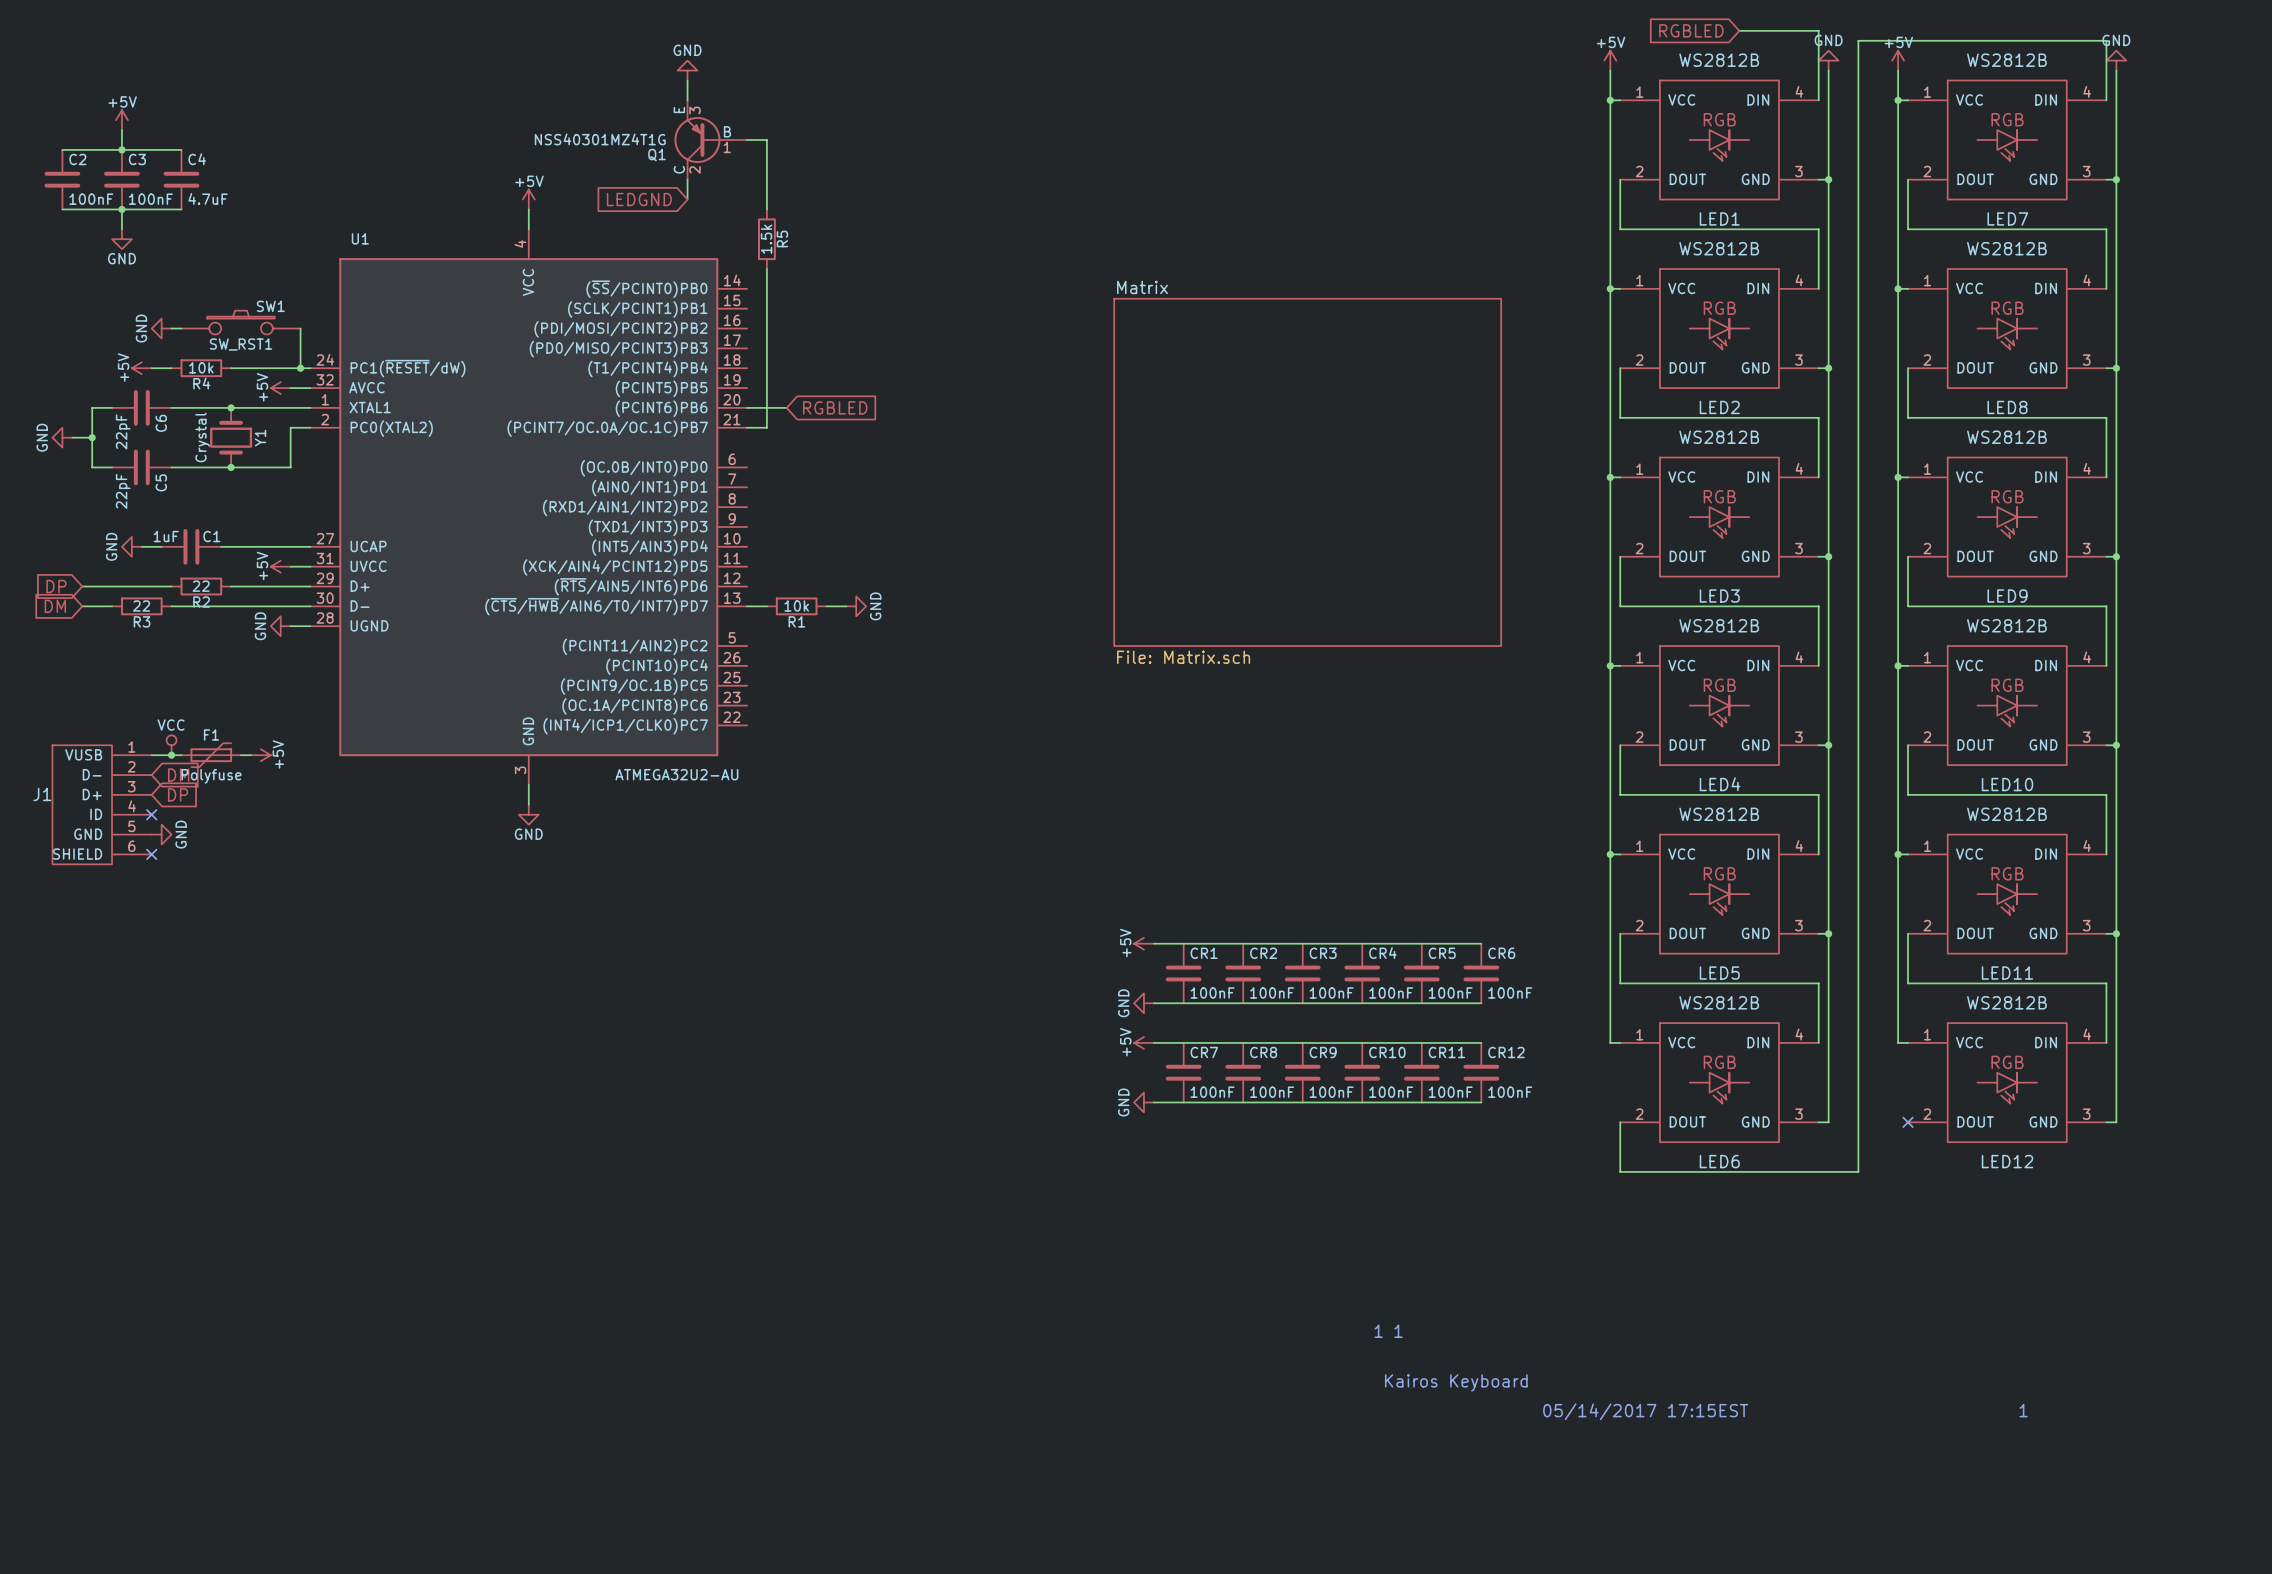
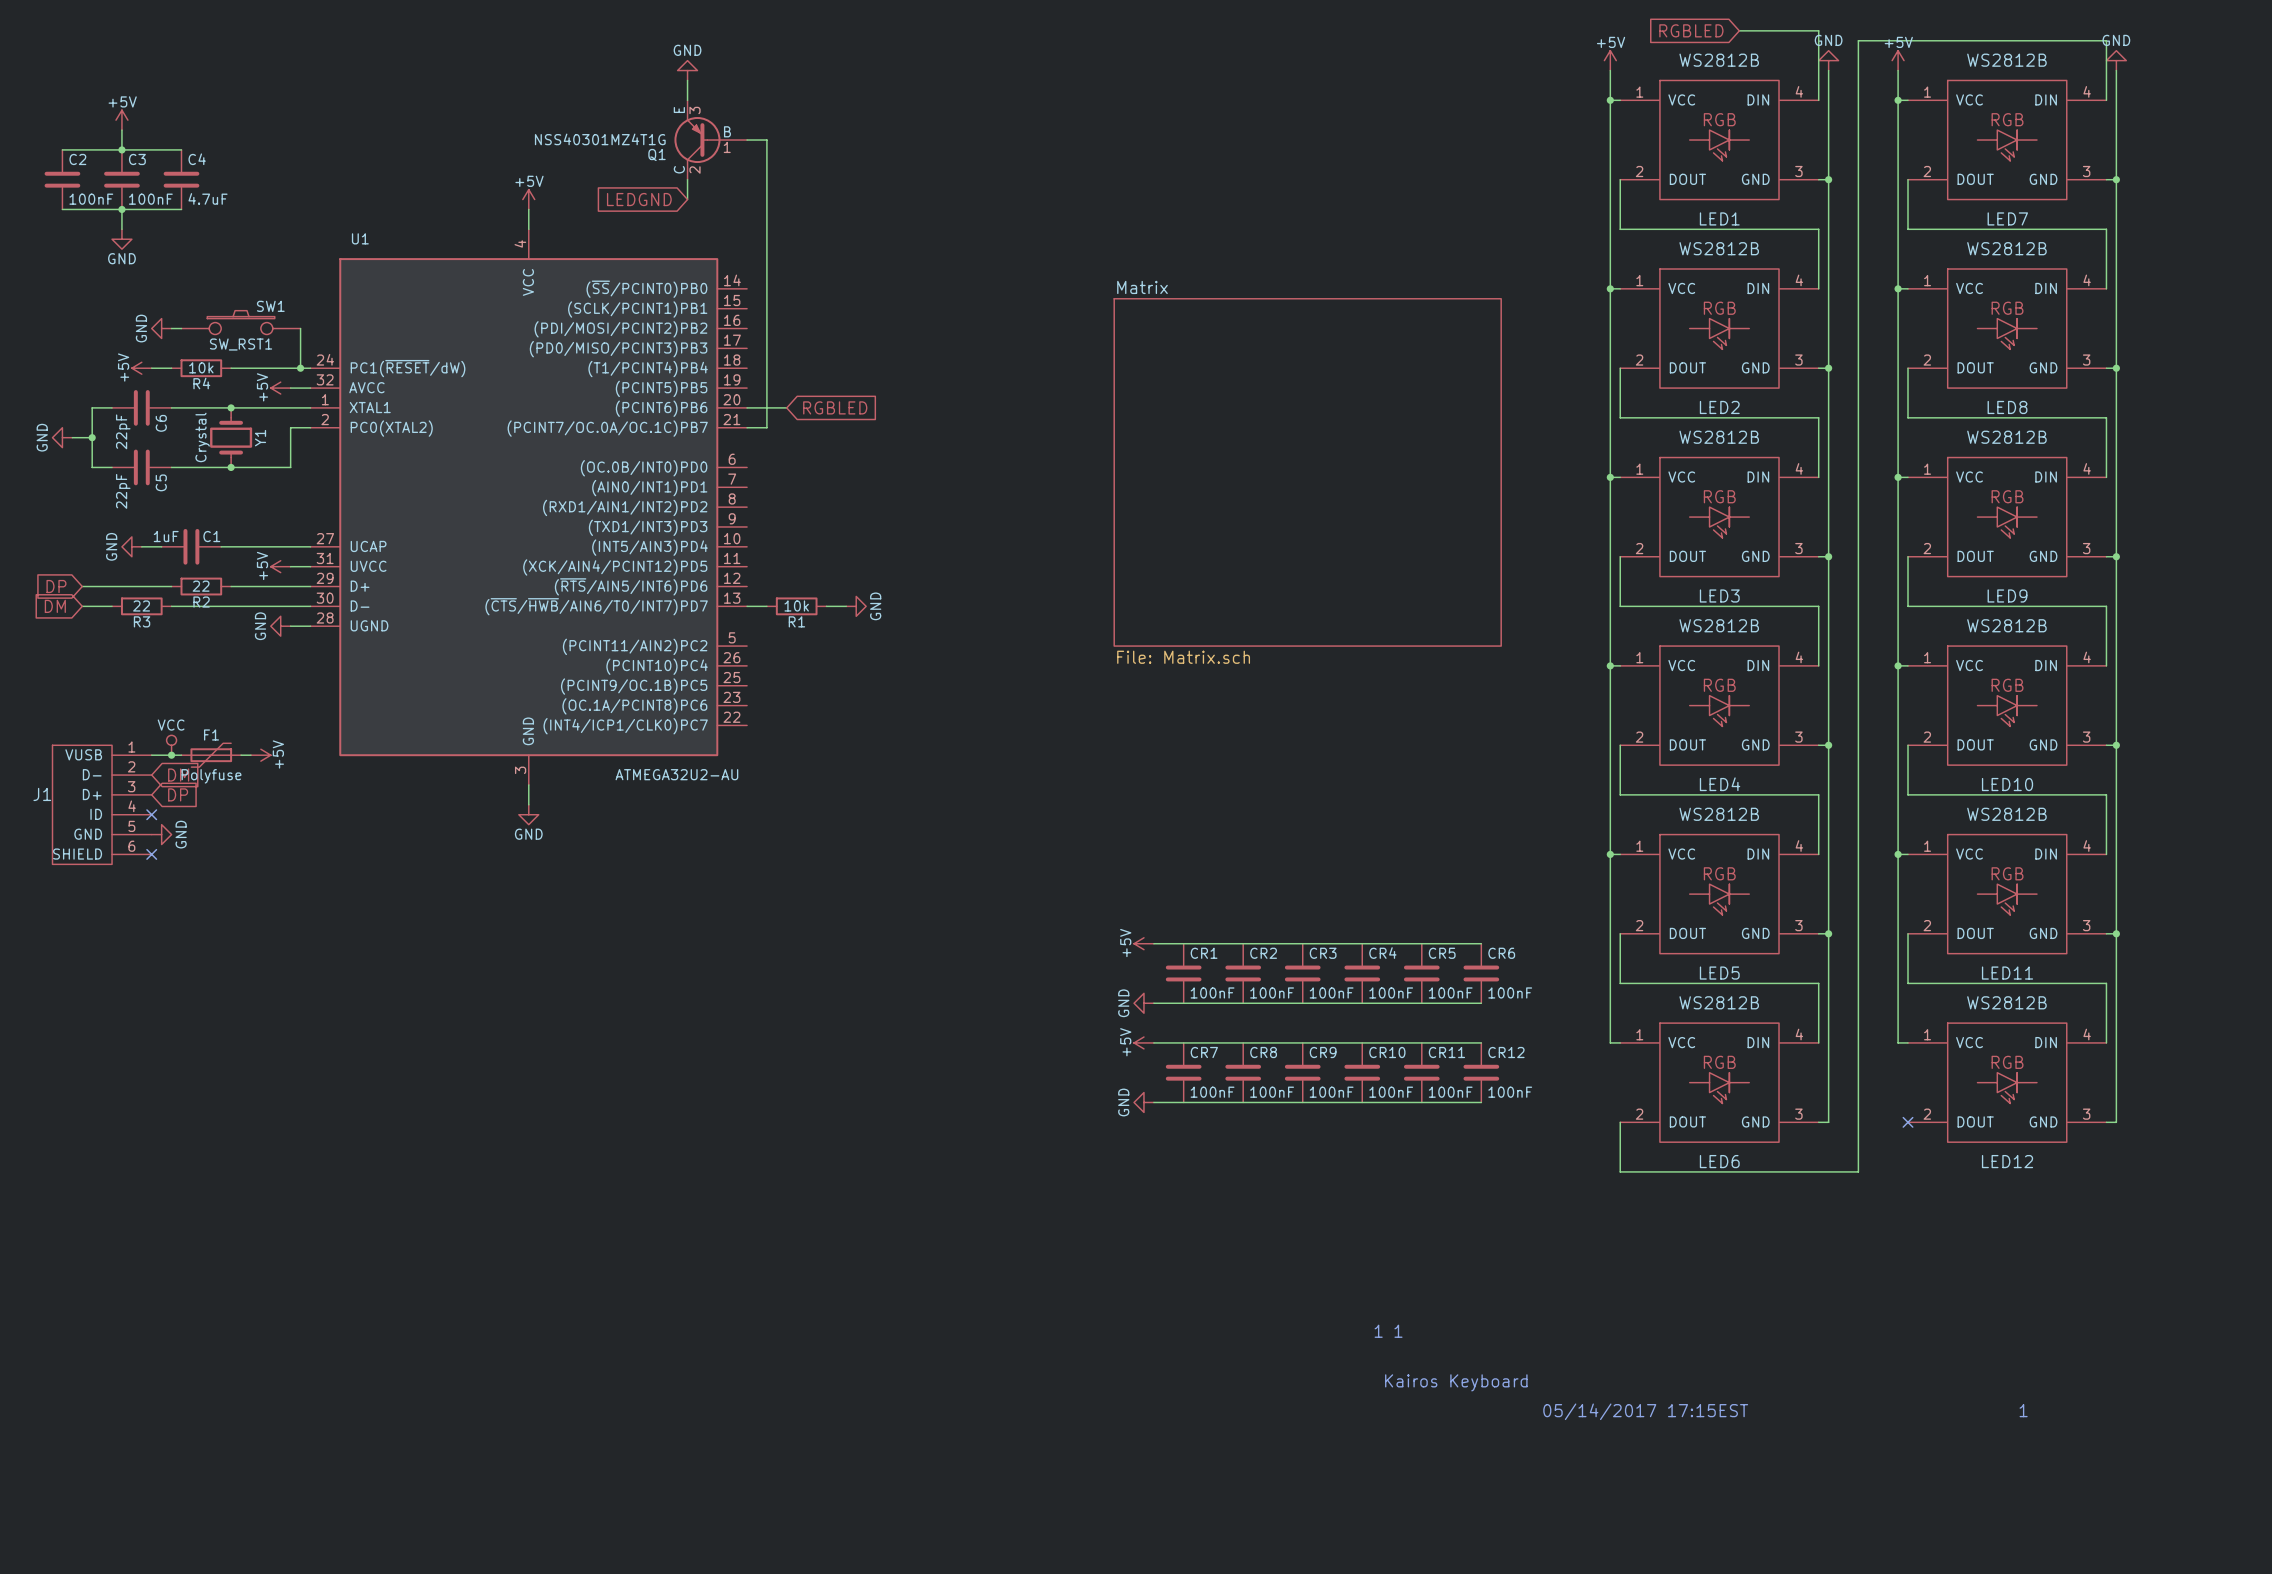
wire: none -> (766, 209) (766, 269)
R5: 1.5k (766, 239) -> none

